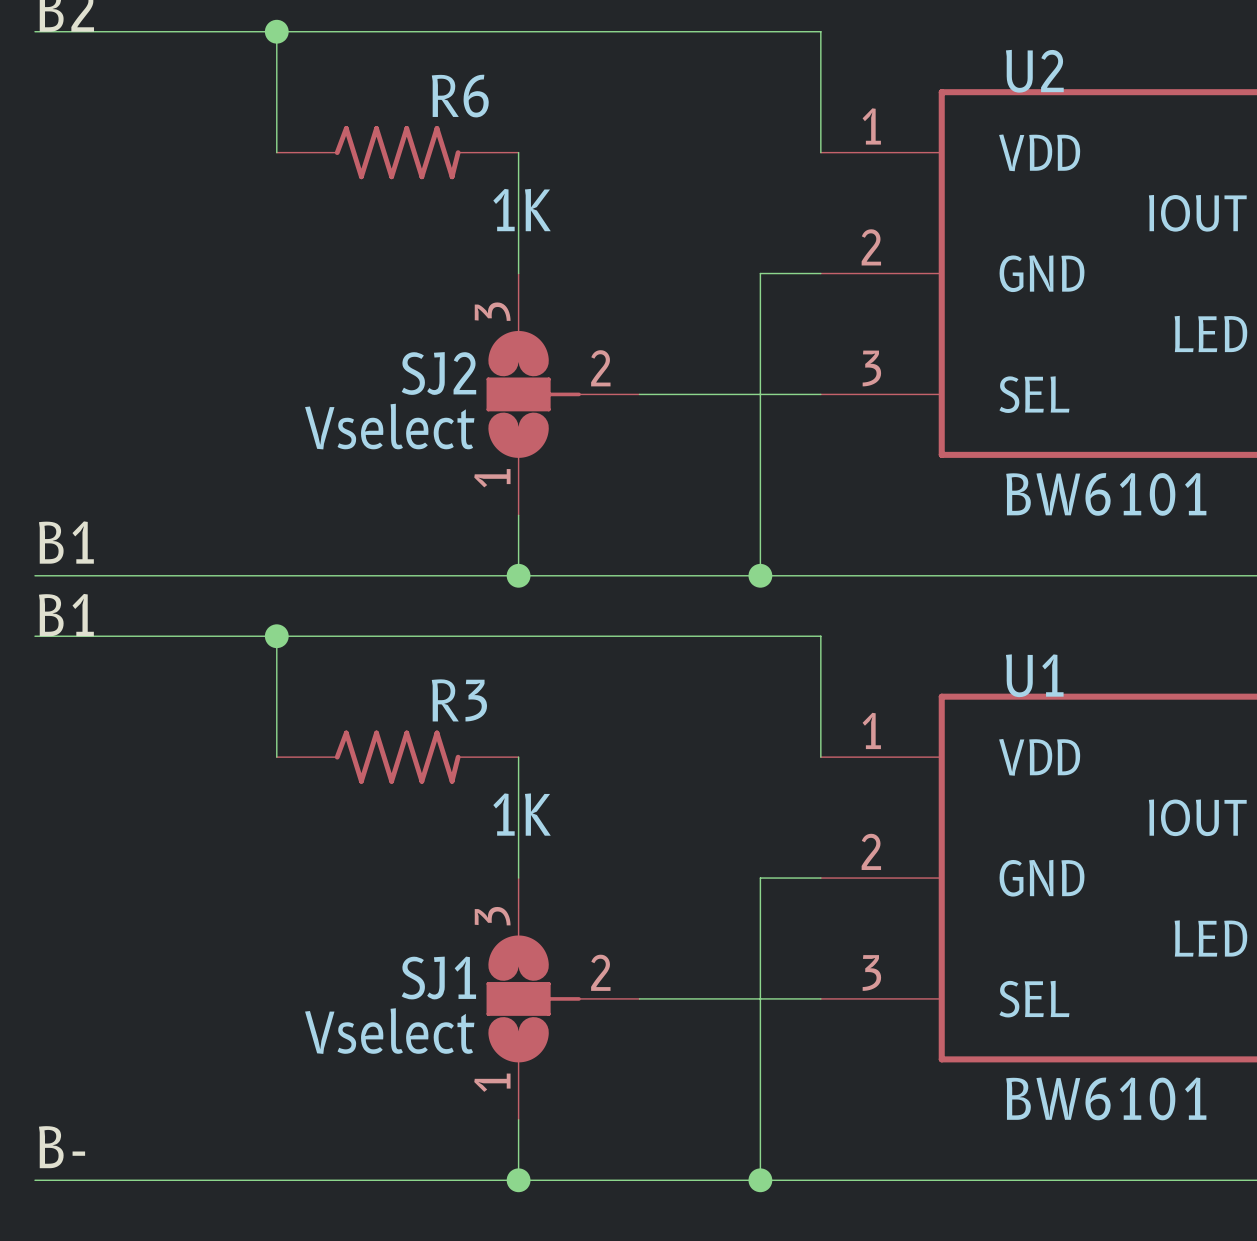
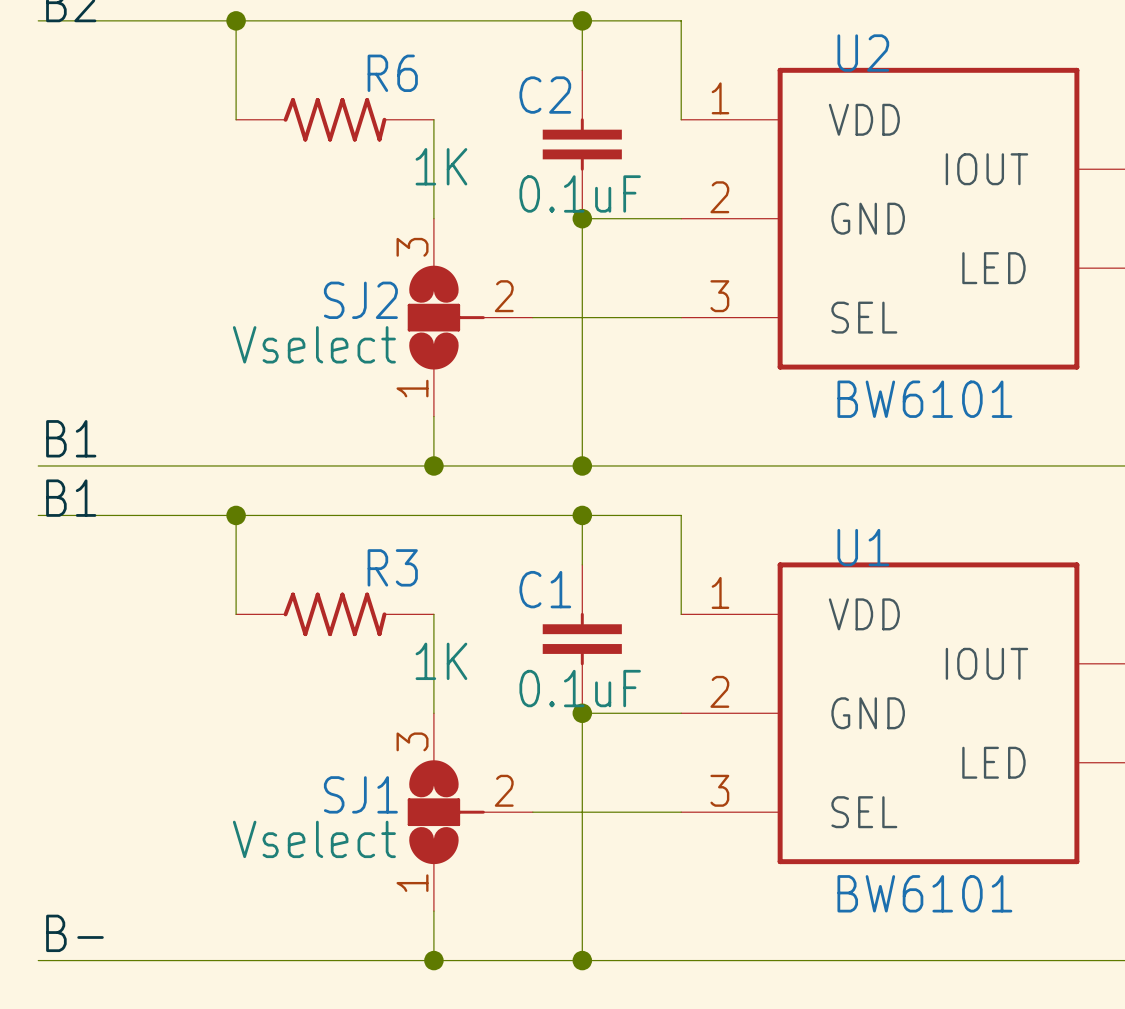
wire: none -> (582, 20) (582, 70)
junction: none -> (582, 20)
C2: none -> 0.1uF (582, 144)
junction: none -> (582, 218)
wire: (760, 273) (760, 575) -> (631, 218) (582, 218) (582, 465)
junction: none -> (582, 465)
junction: (760, 575) -> none
wire: none -> (582, 515) (582, 564)
junction: none -> (582, 515)
C1: none -> 0.1uF (582, 639)
junction: none -> (582, 713)
wire: (760, 878) (760, 1180) -> (631, 713) (582, 713) (582, 960)
junction position: (760, 1180) -> (582, 960)

